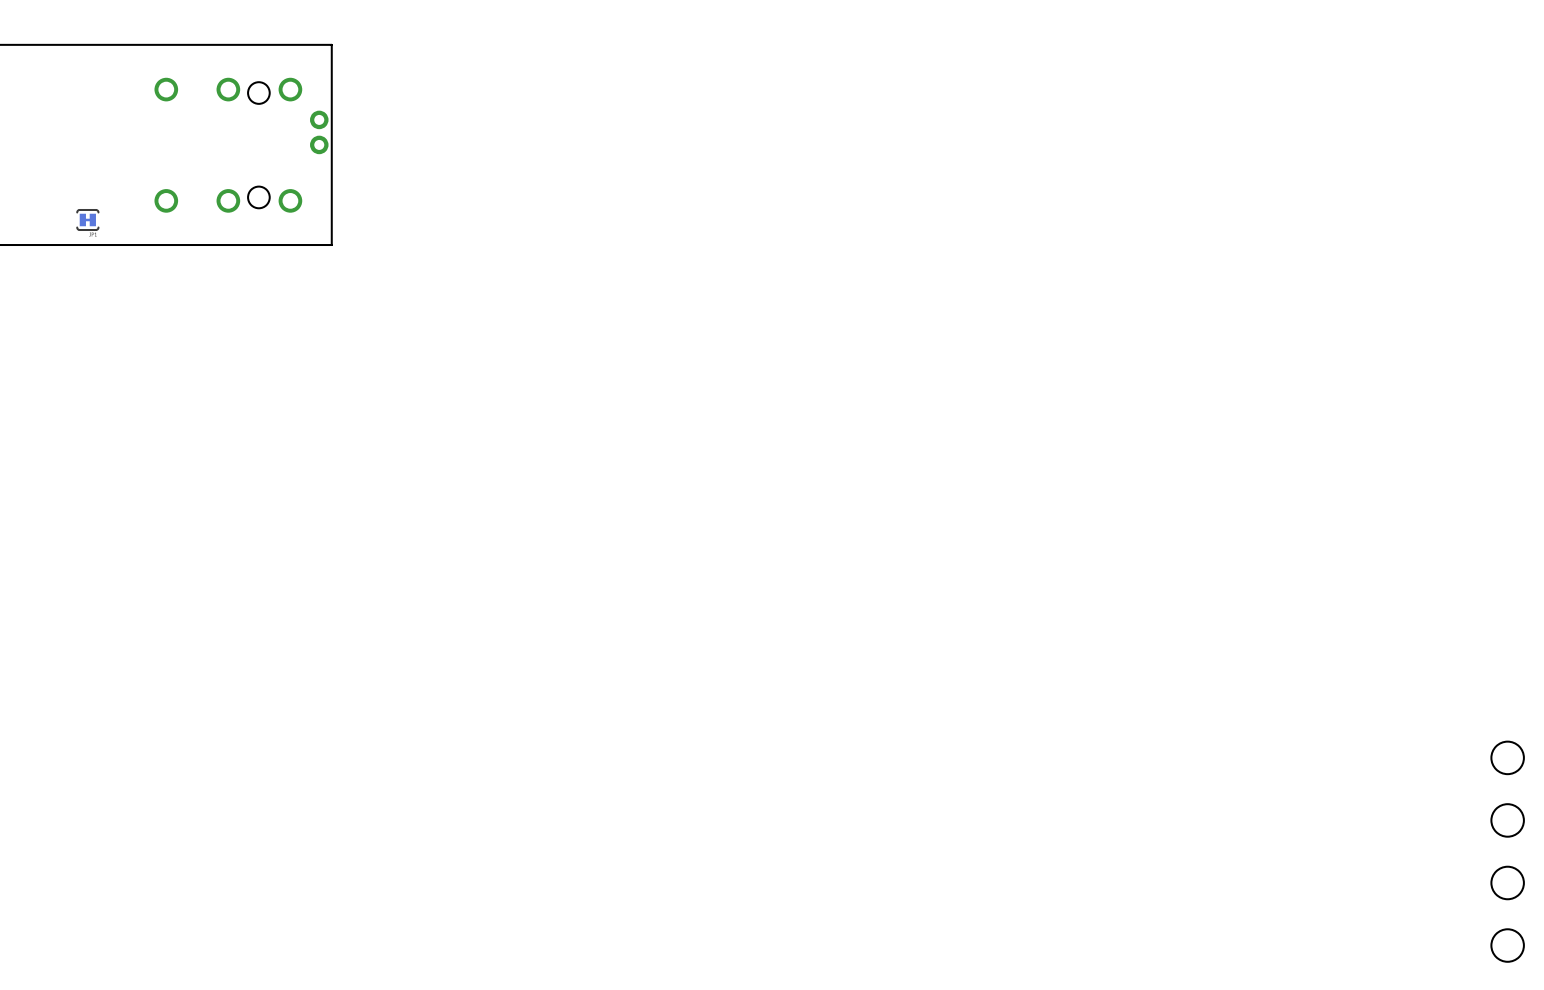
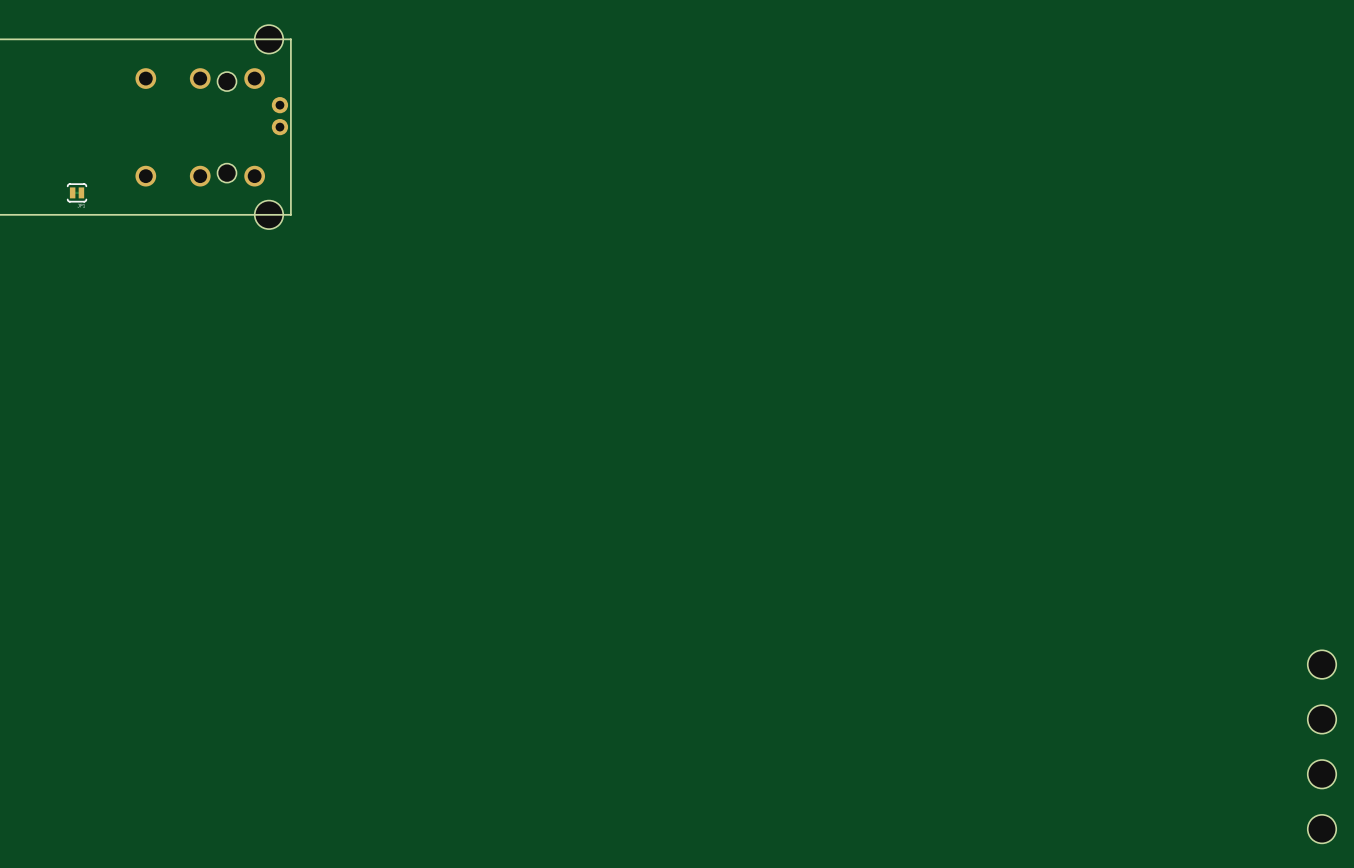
part: none -> (268, 39)
part: none -> (268, 214)

